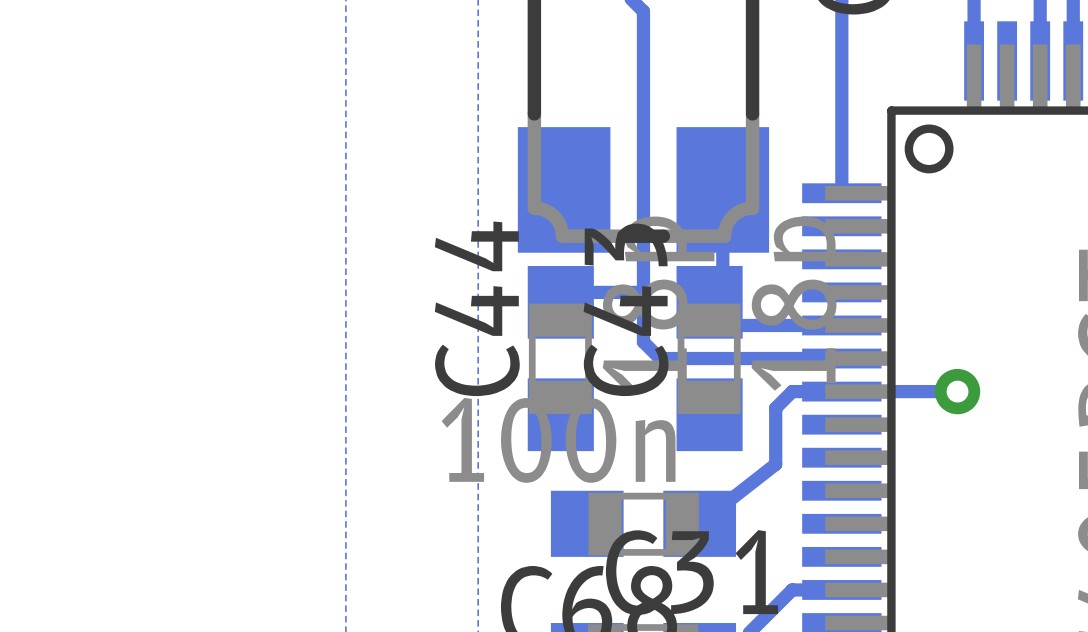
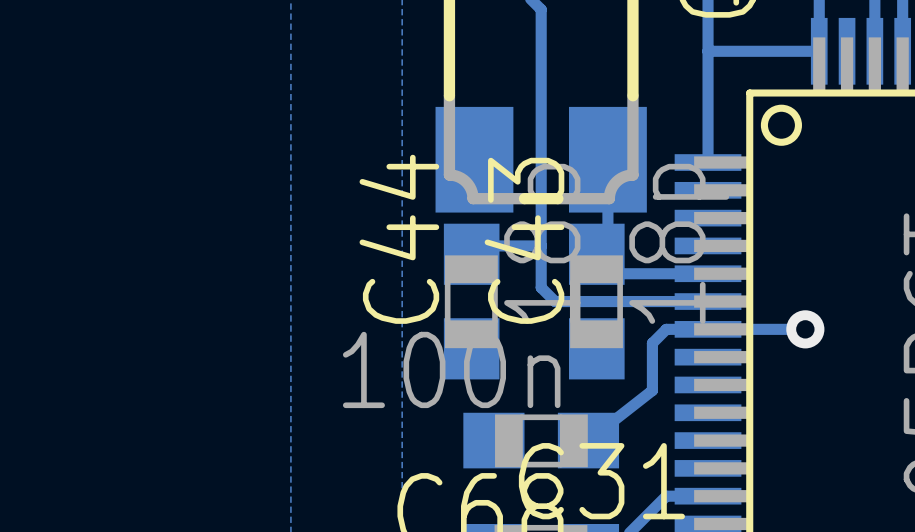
track: none -> (819, 51) (708, 51)

